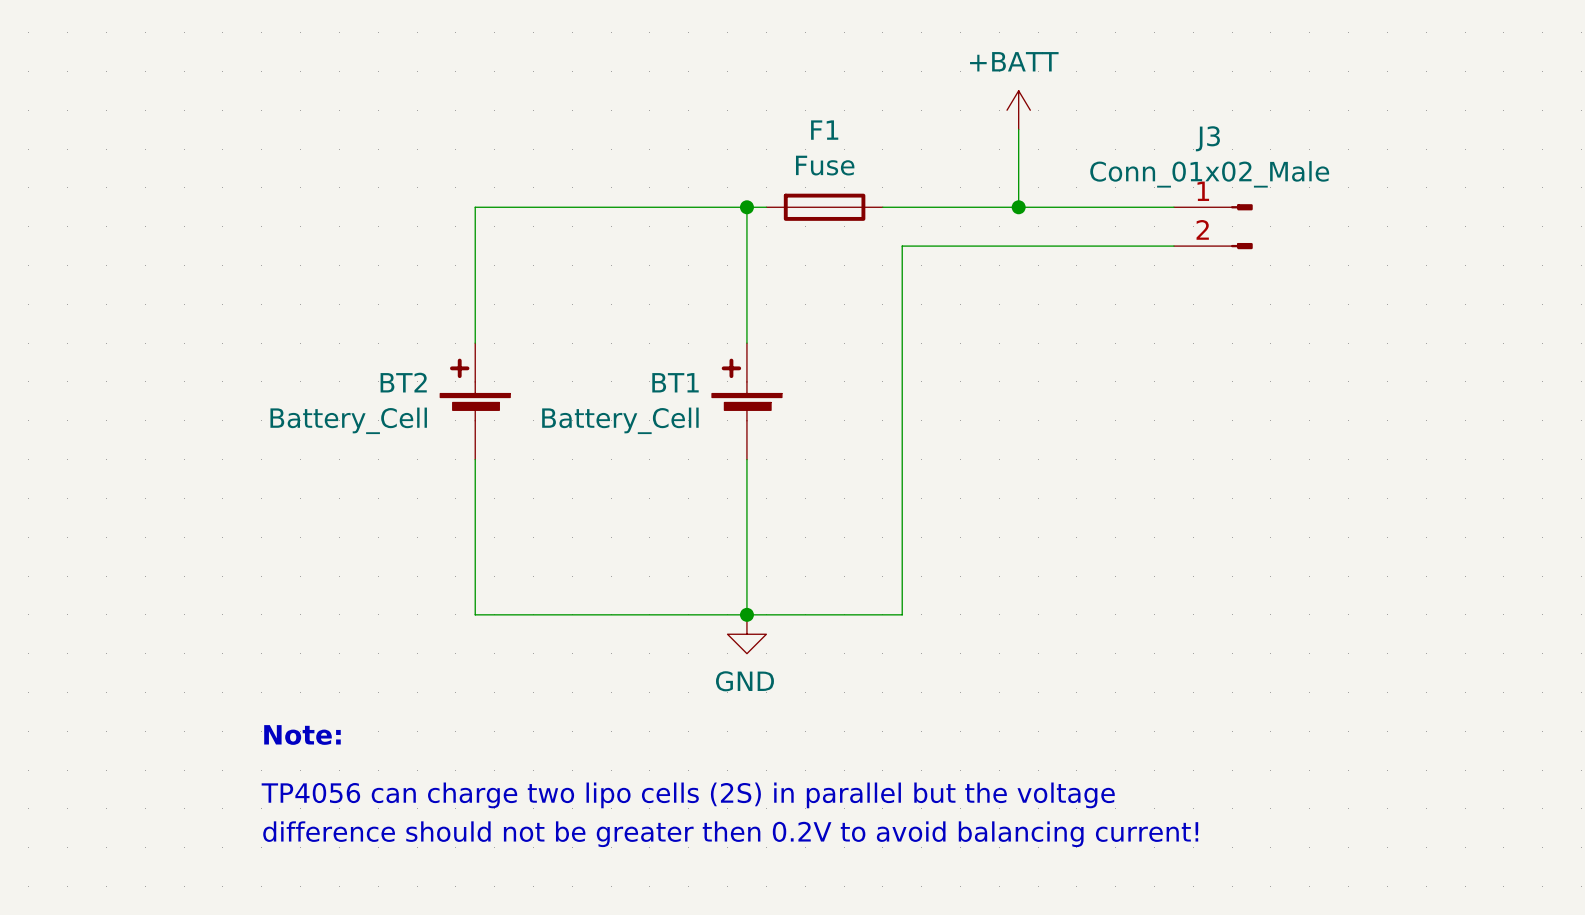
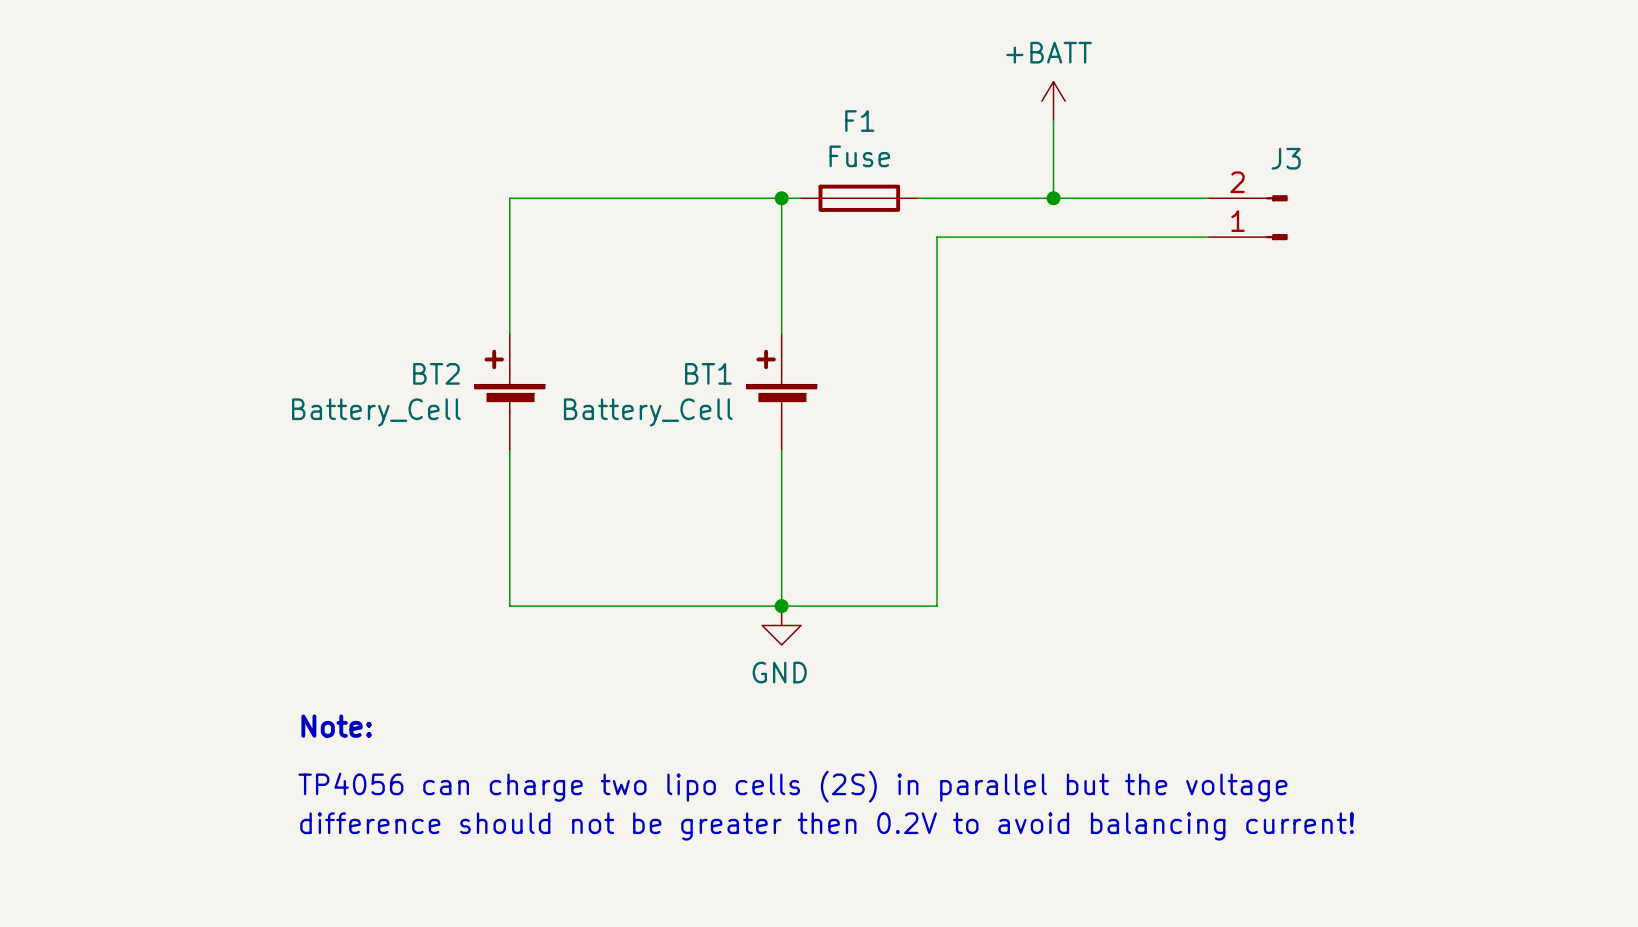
J3 name position: J3 (1207, 138) -> J3 (1286, 158)
J3 value: Conn_01x02_Male (1209, 174) -> none
J3 flip: as is (1241, 226) -> up-down (1276, 217)

